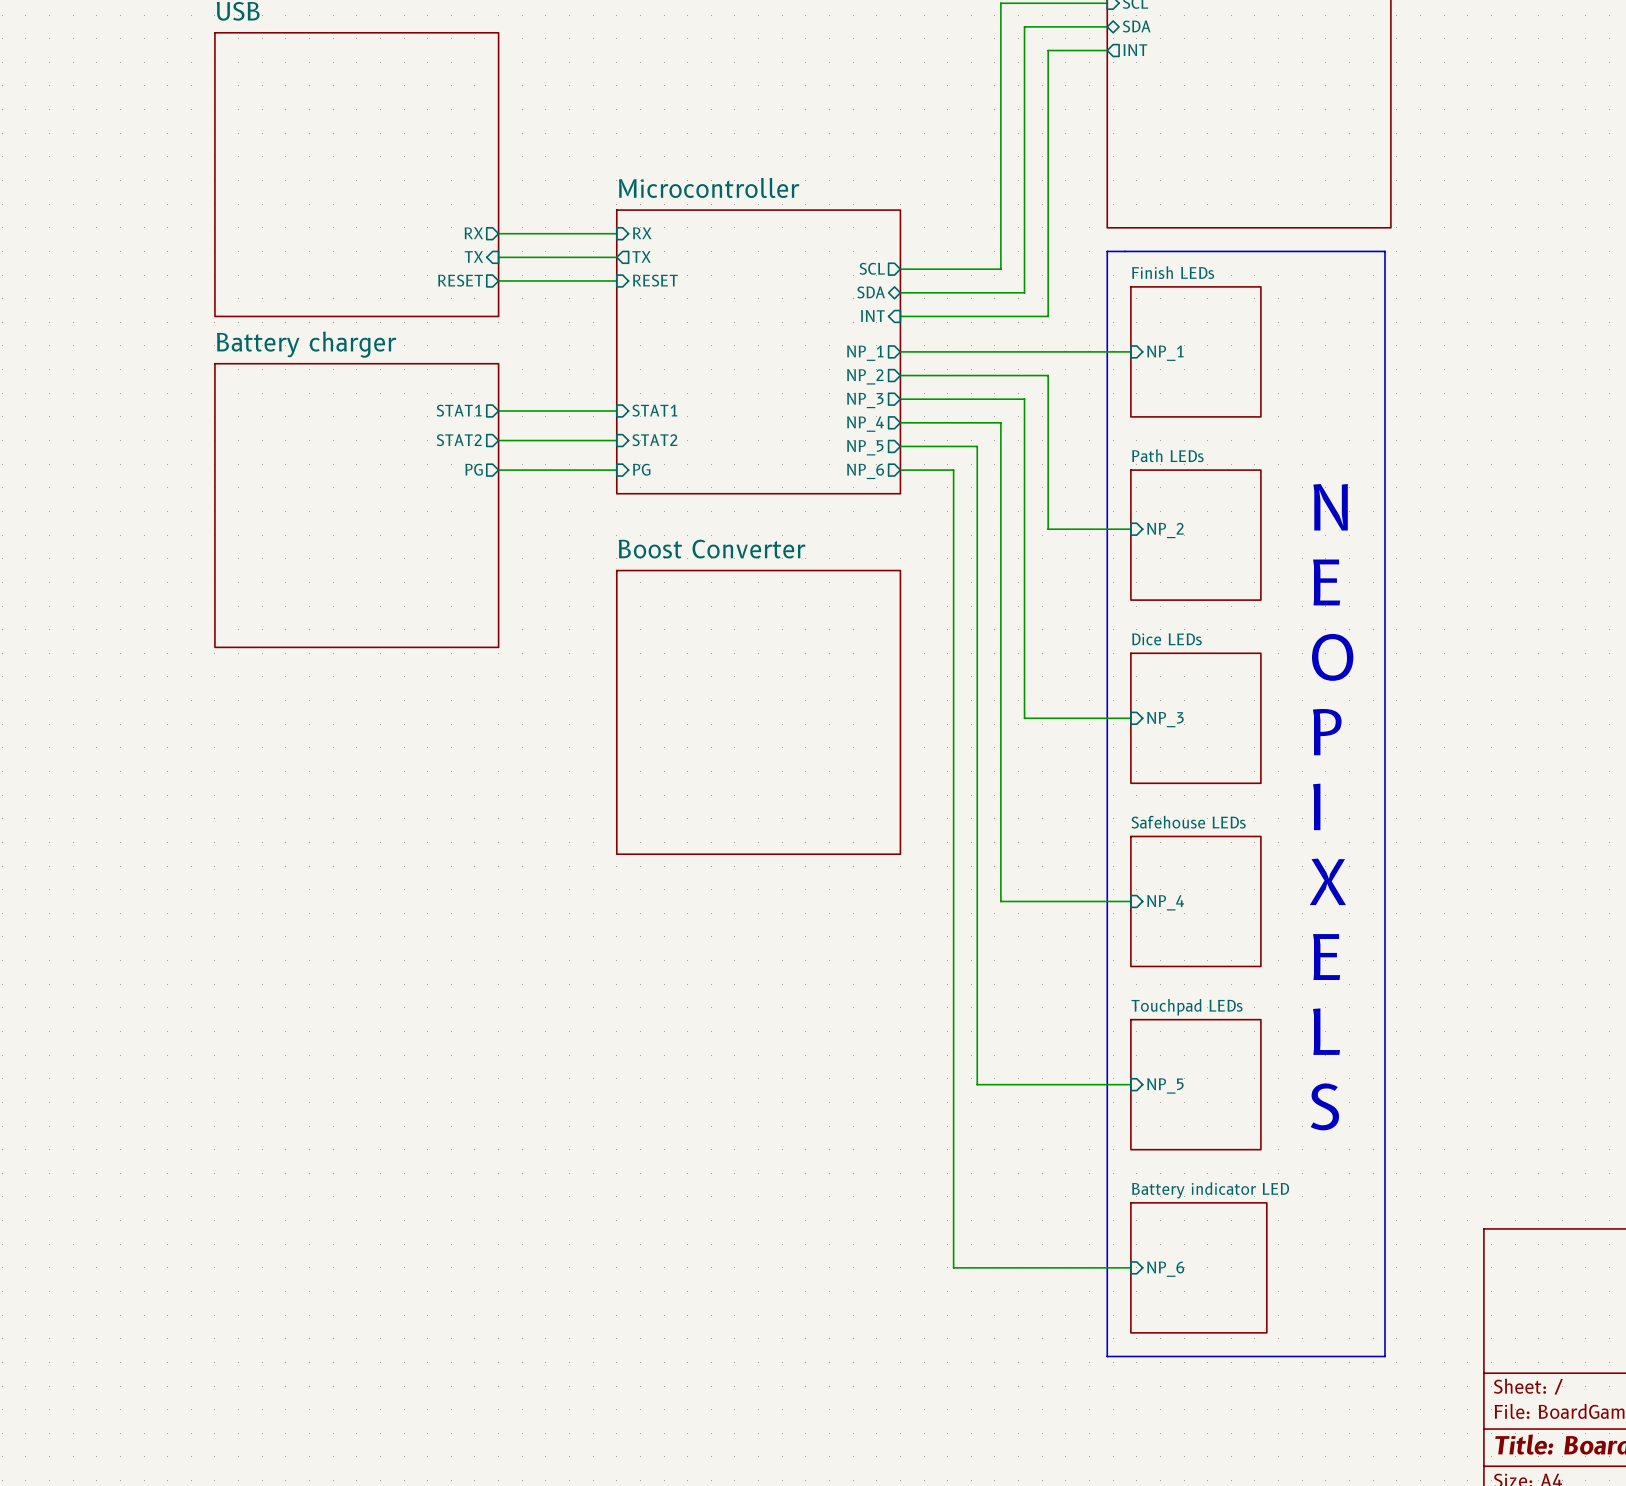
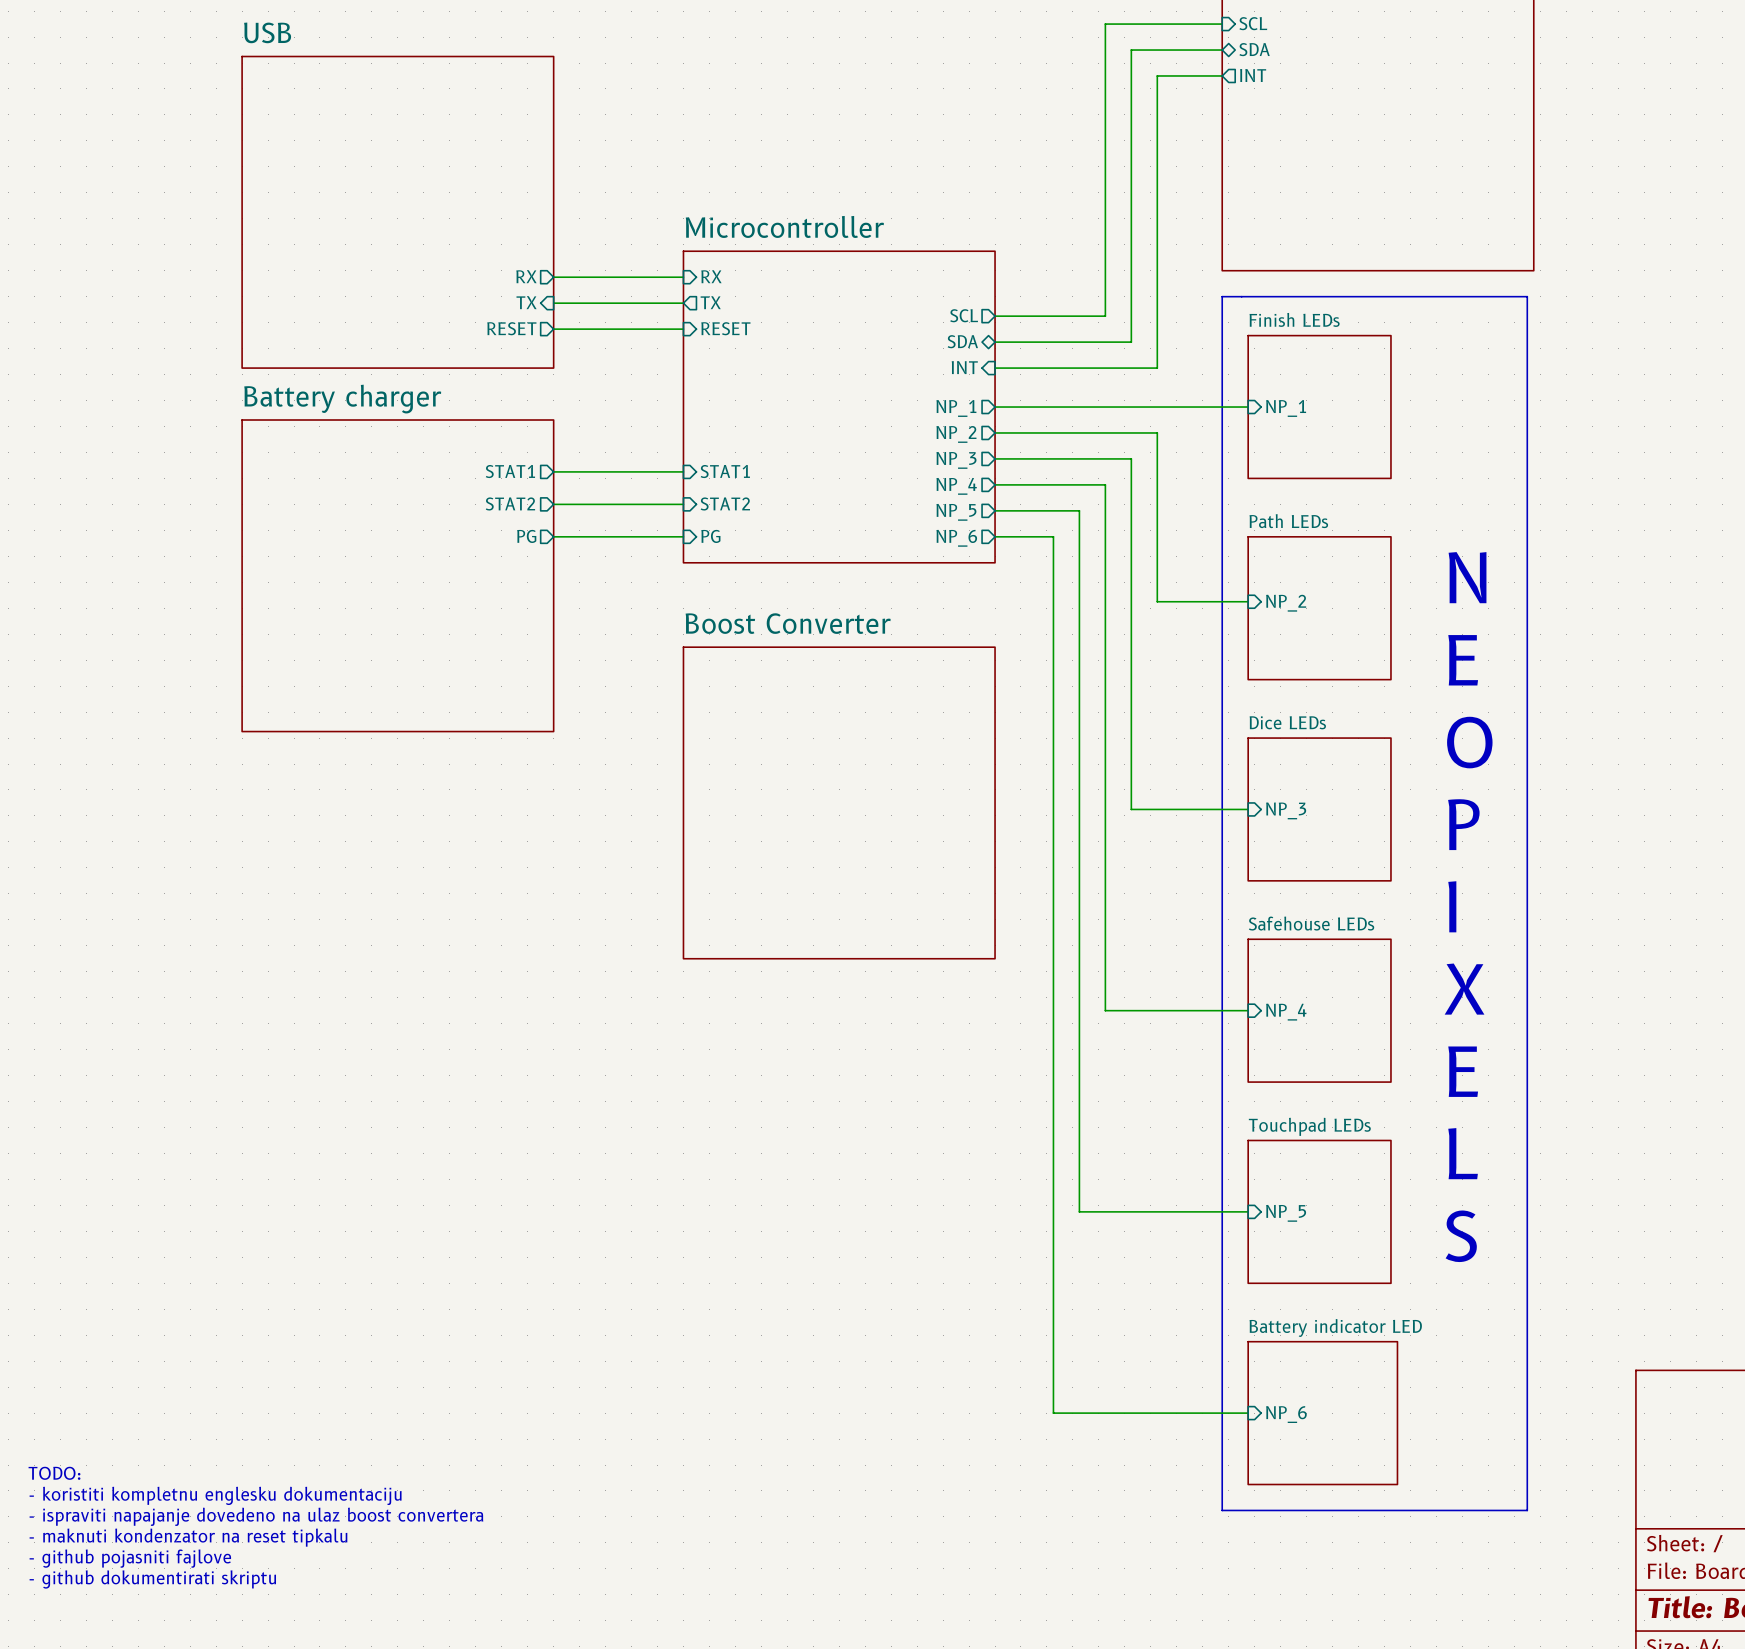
text: none -> TODO: (54, 1473)
text: none -> - koristiti kompletnu englesku dokumentaciju (215, 1495)
text: none -> - ispraviti napajanje dovedeno na ulaz boost convertera (256, 1516)
text: none -> - maknuti kondenzator na reset tipkalu (188, 1537)
text: none -> - github pojasniti fajlove (130, 1558)
text: none -> - github dokumentirati skriptu (152, 1579)

